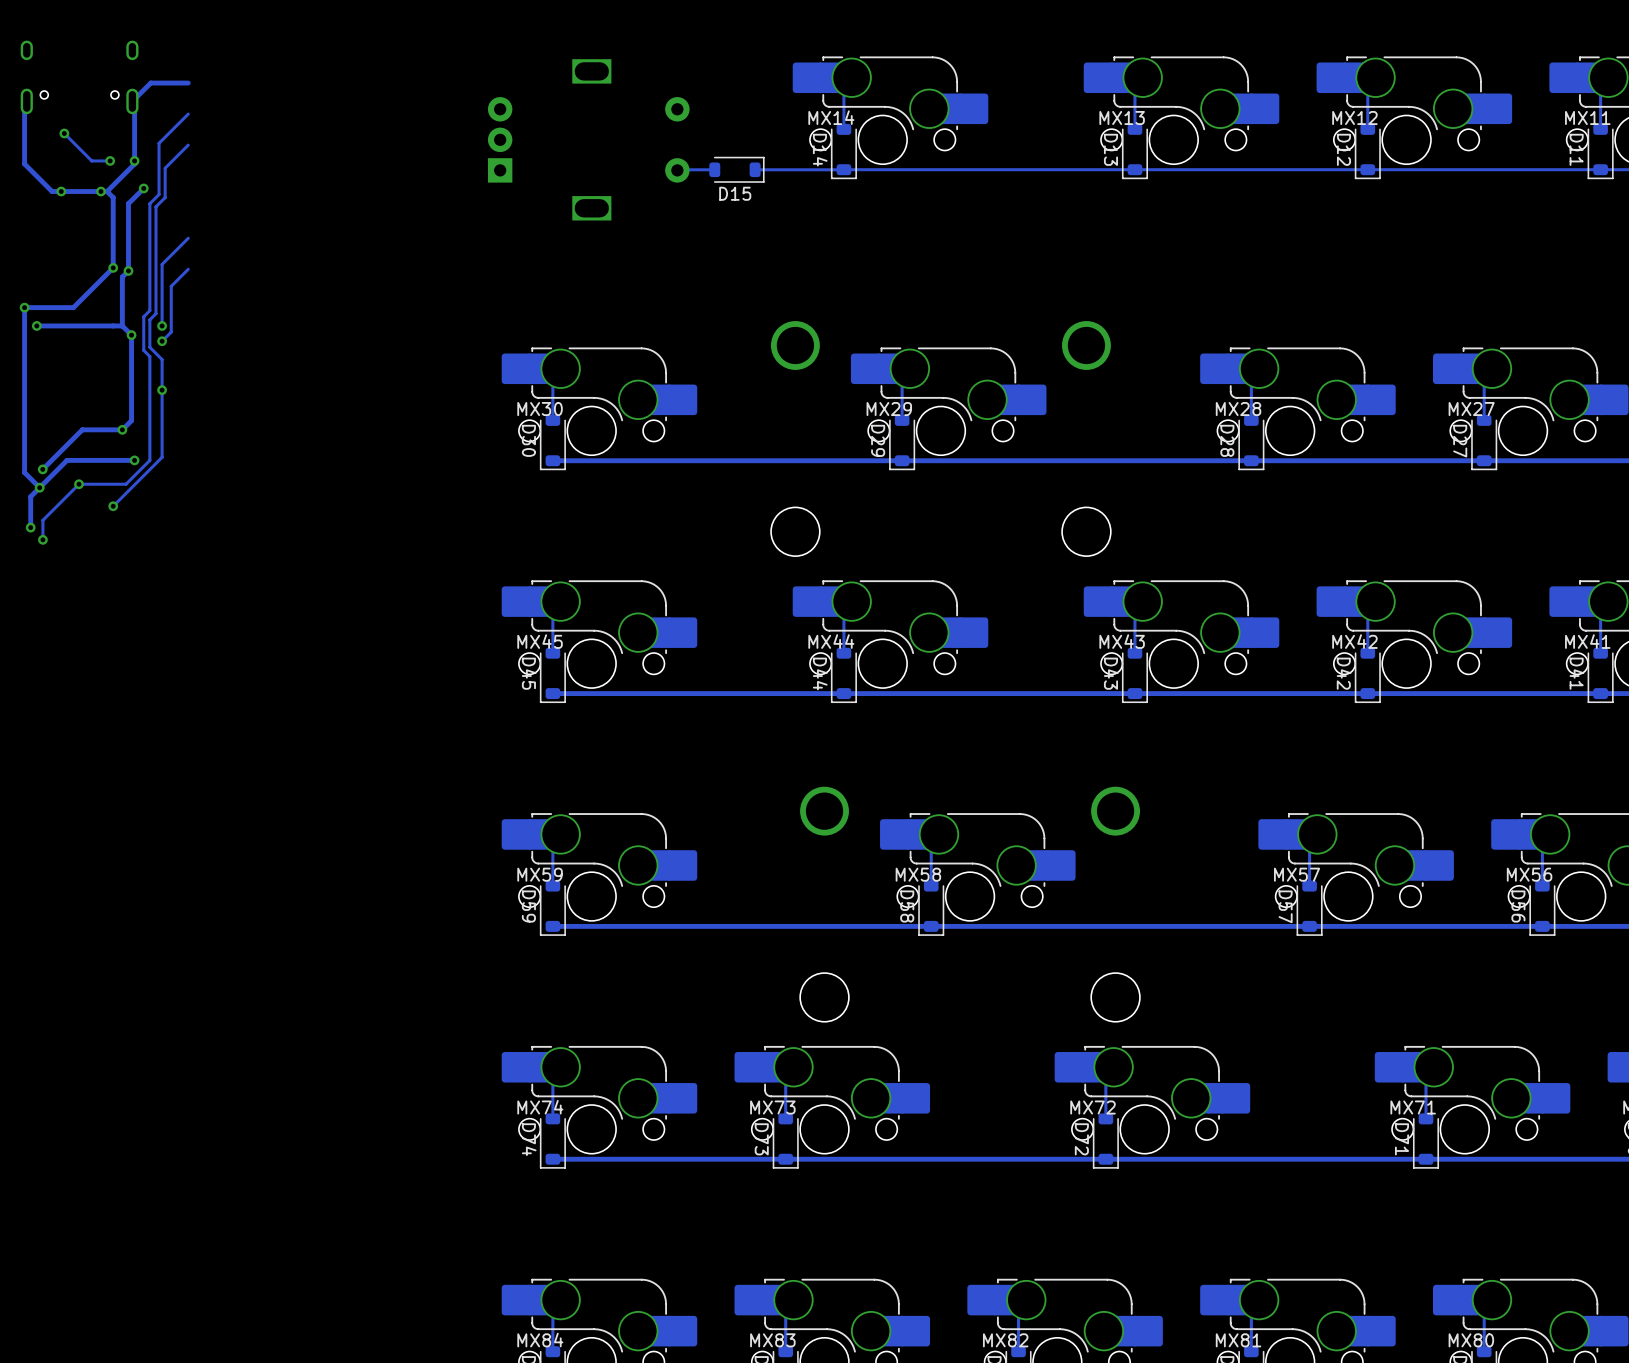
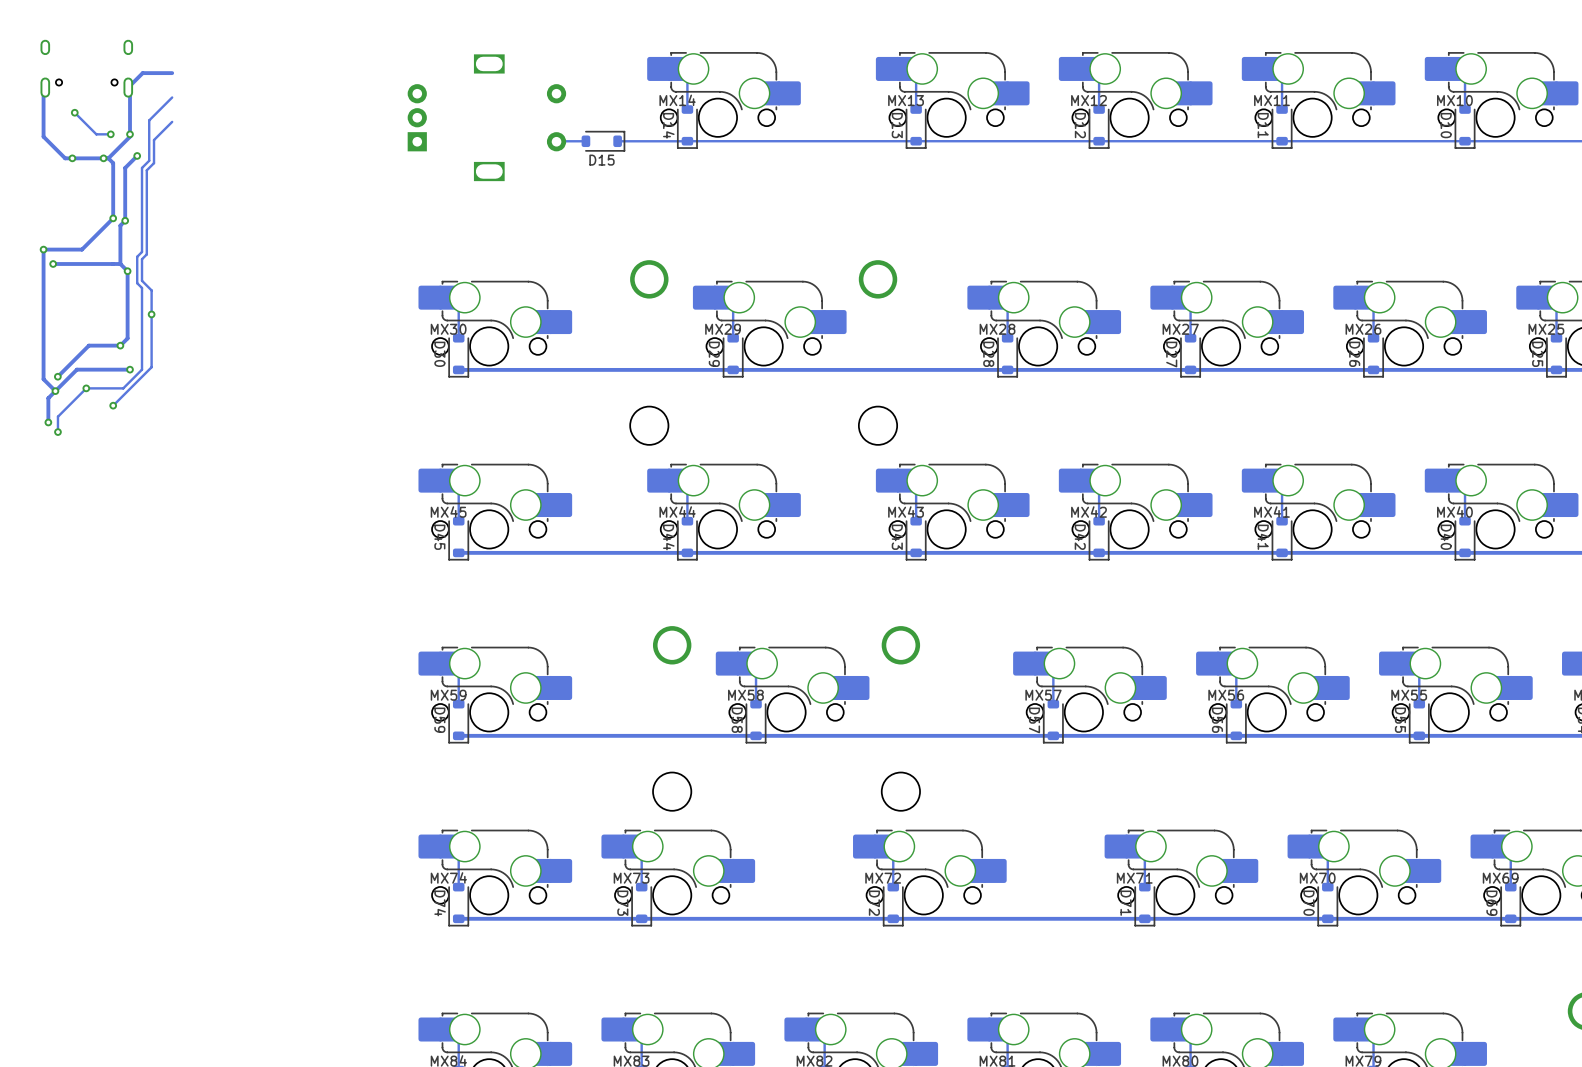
track: (188, 238) (162, 264) (162, 325) -> none
track: (188, 269) (171, 286) (171, 332) (162, 341) -> none
via: (162, 325) -> none
via: (162, 341) -> none

